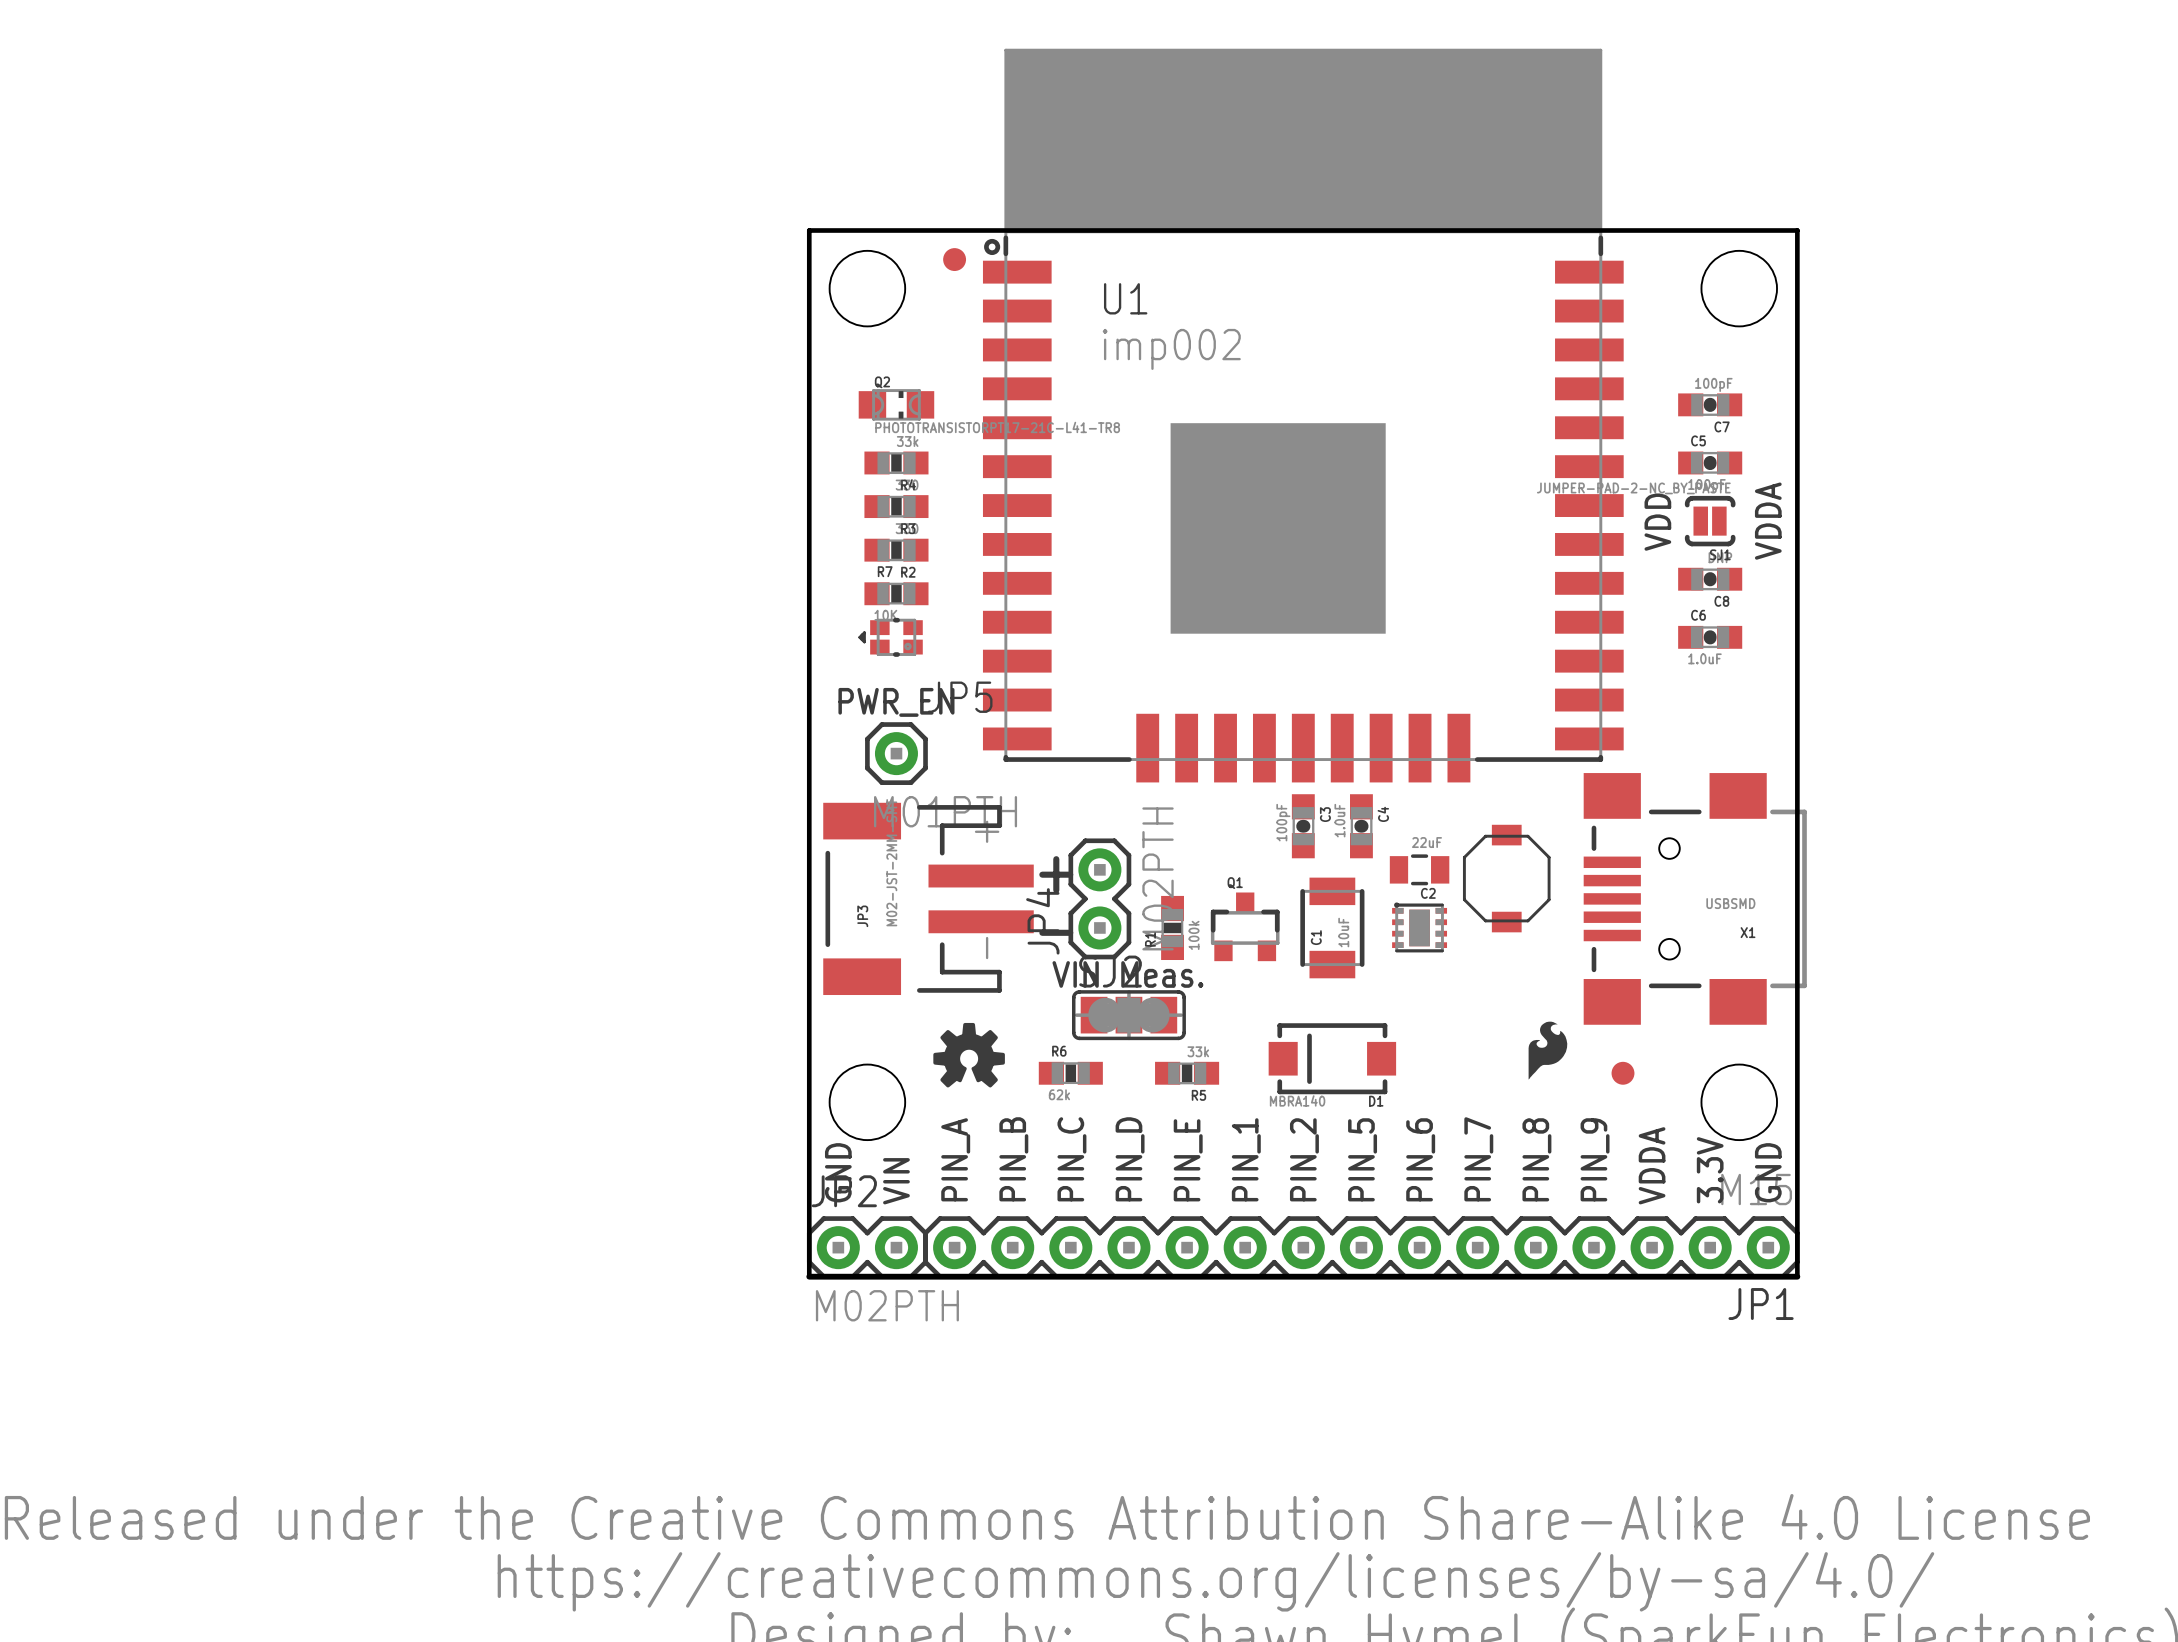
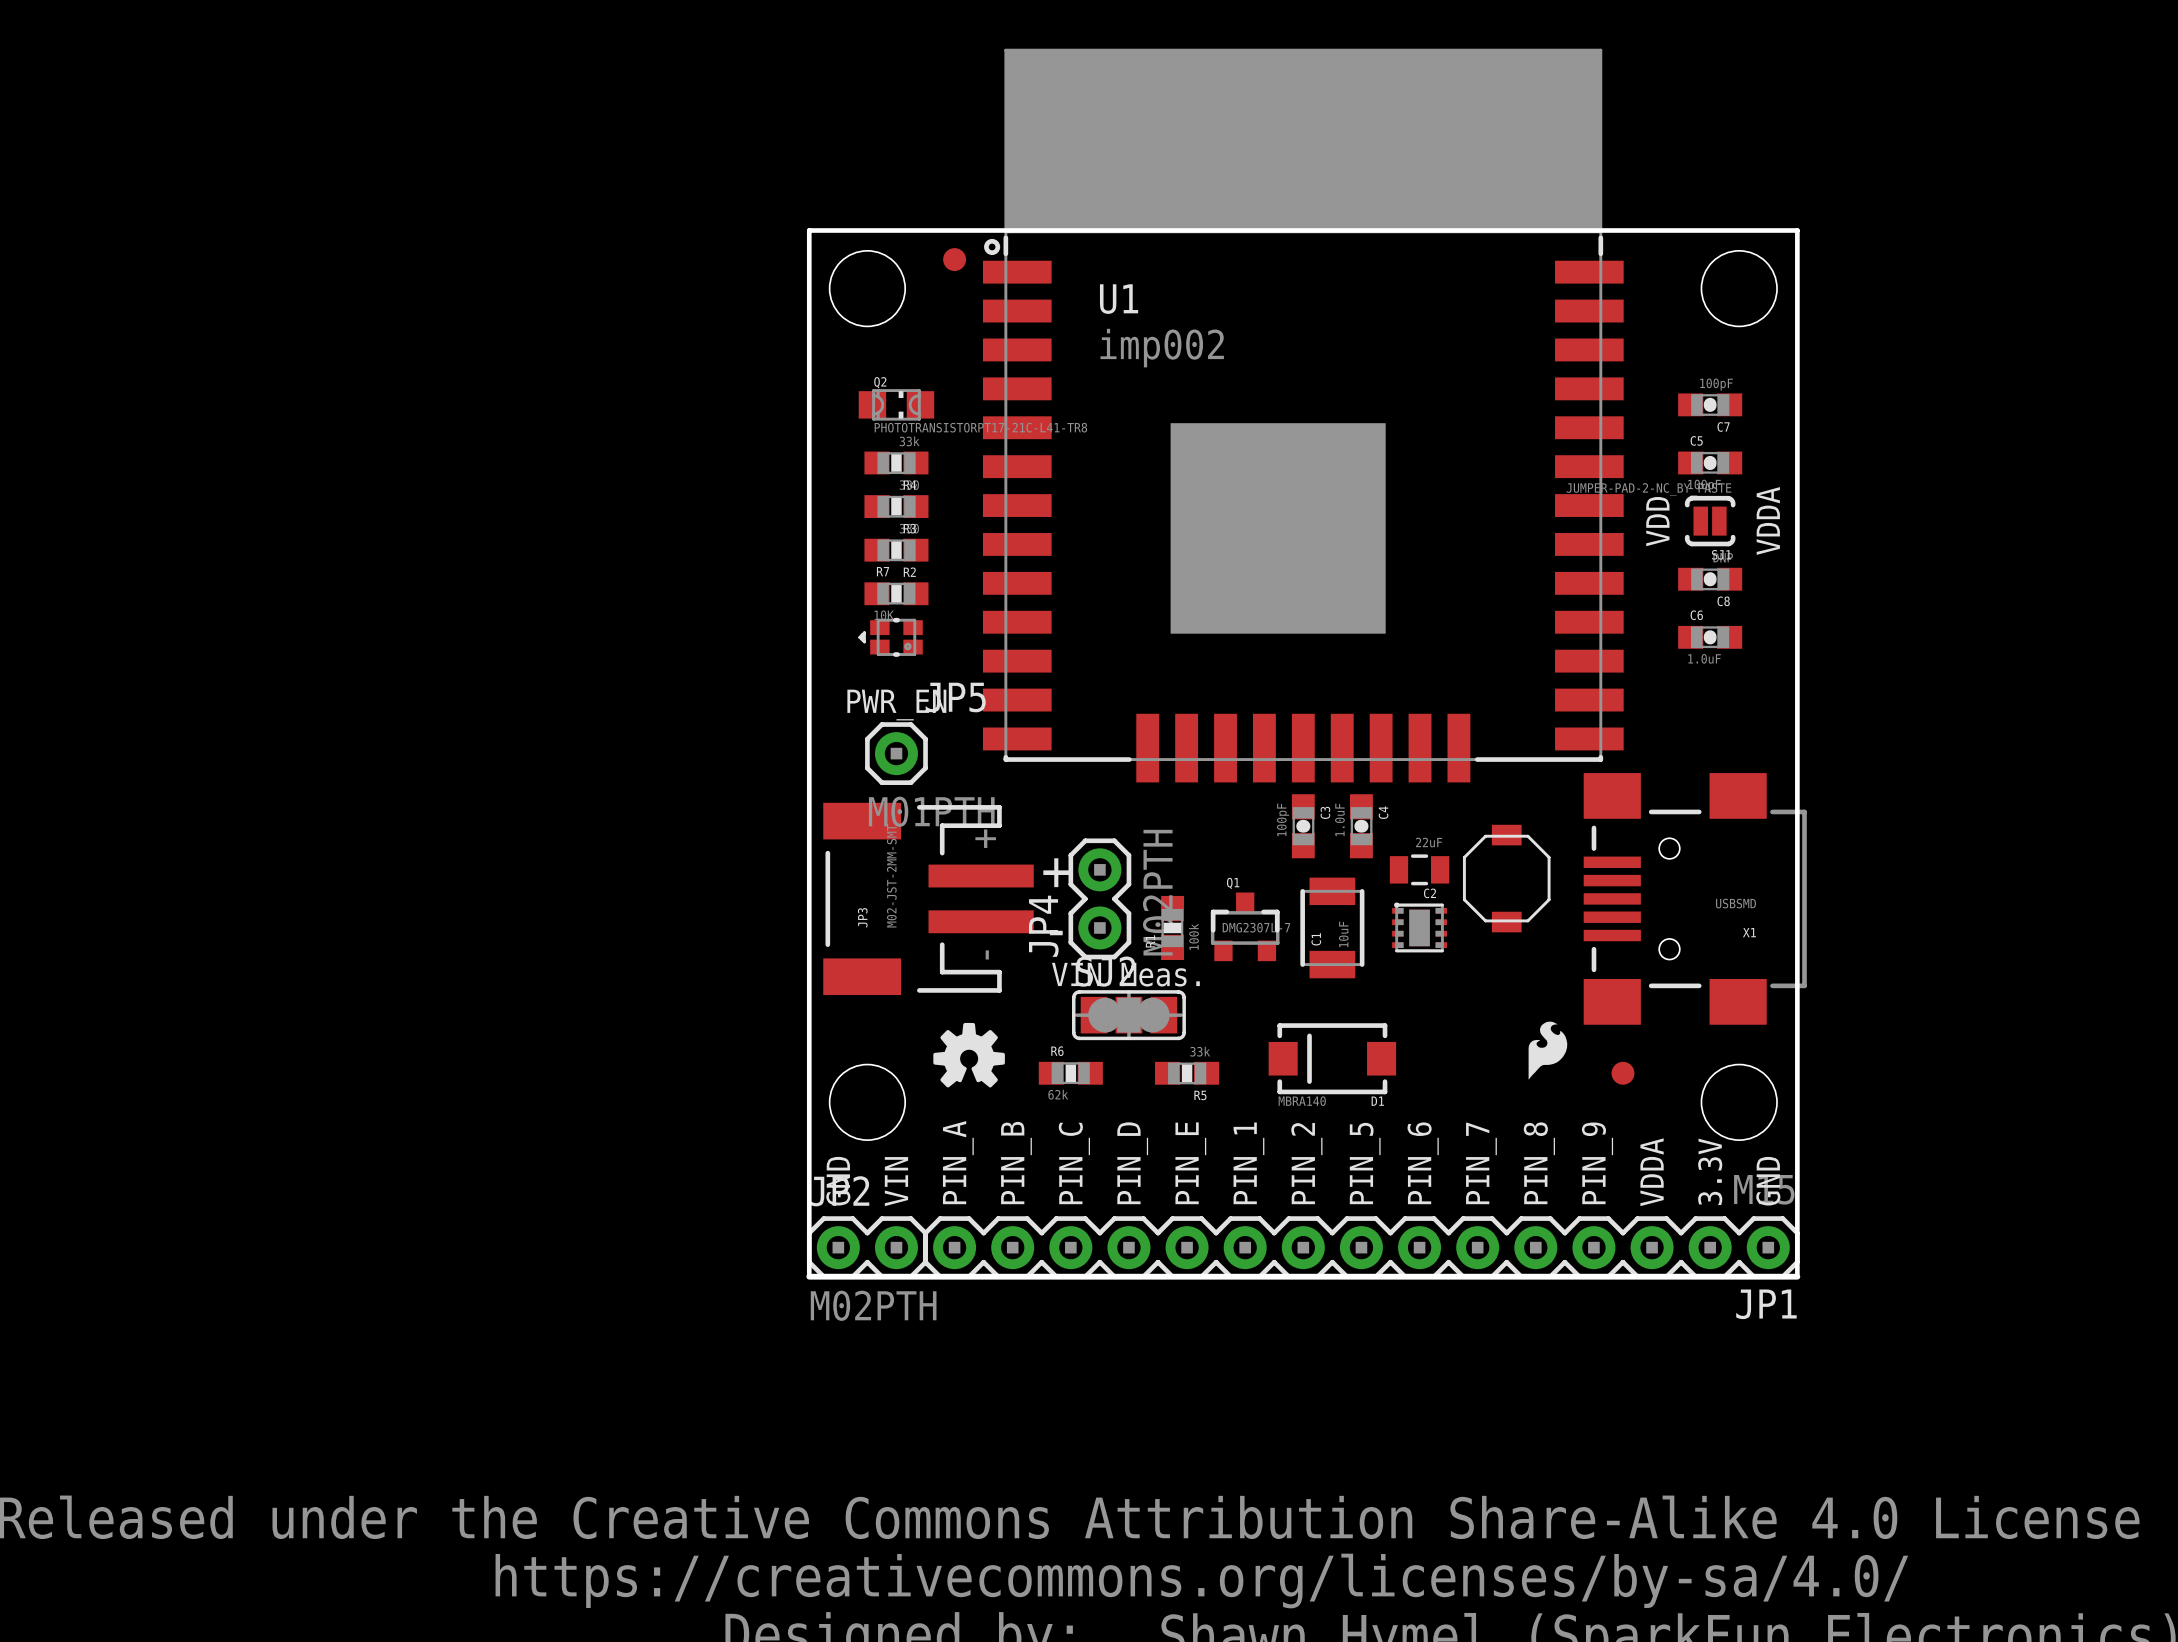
Q1 value: none -> DMG2307L-7 (1256, 927)

